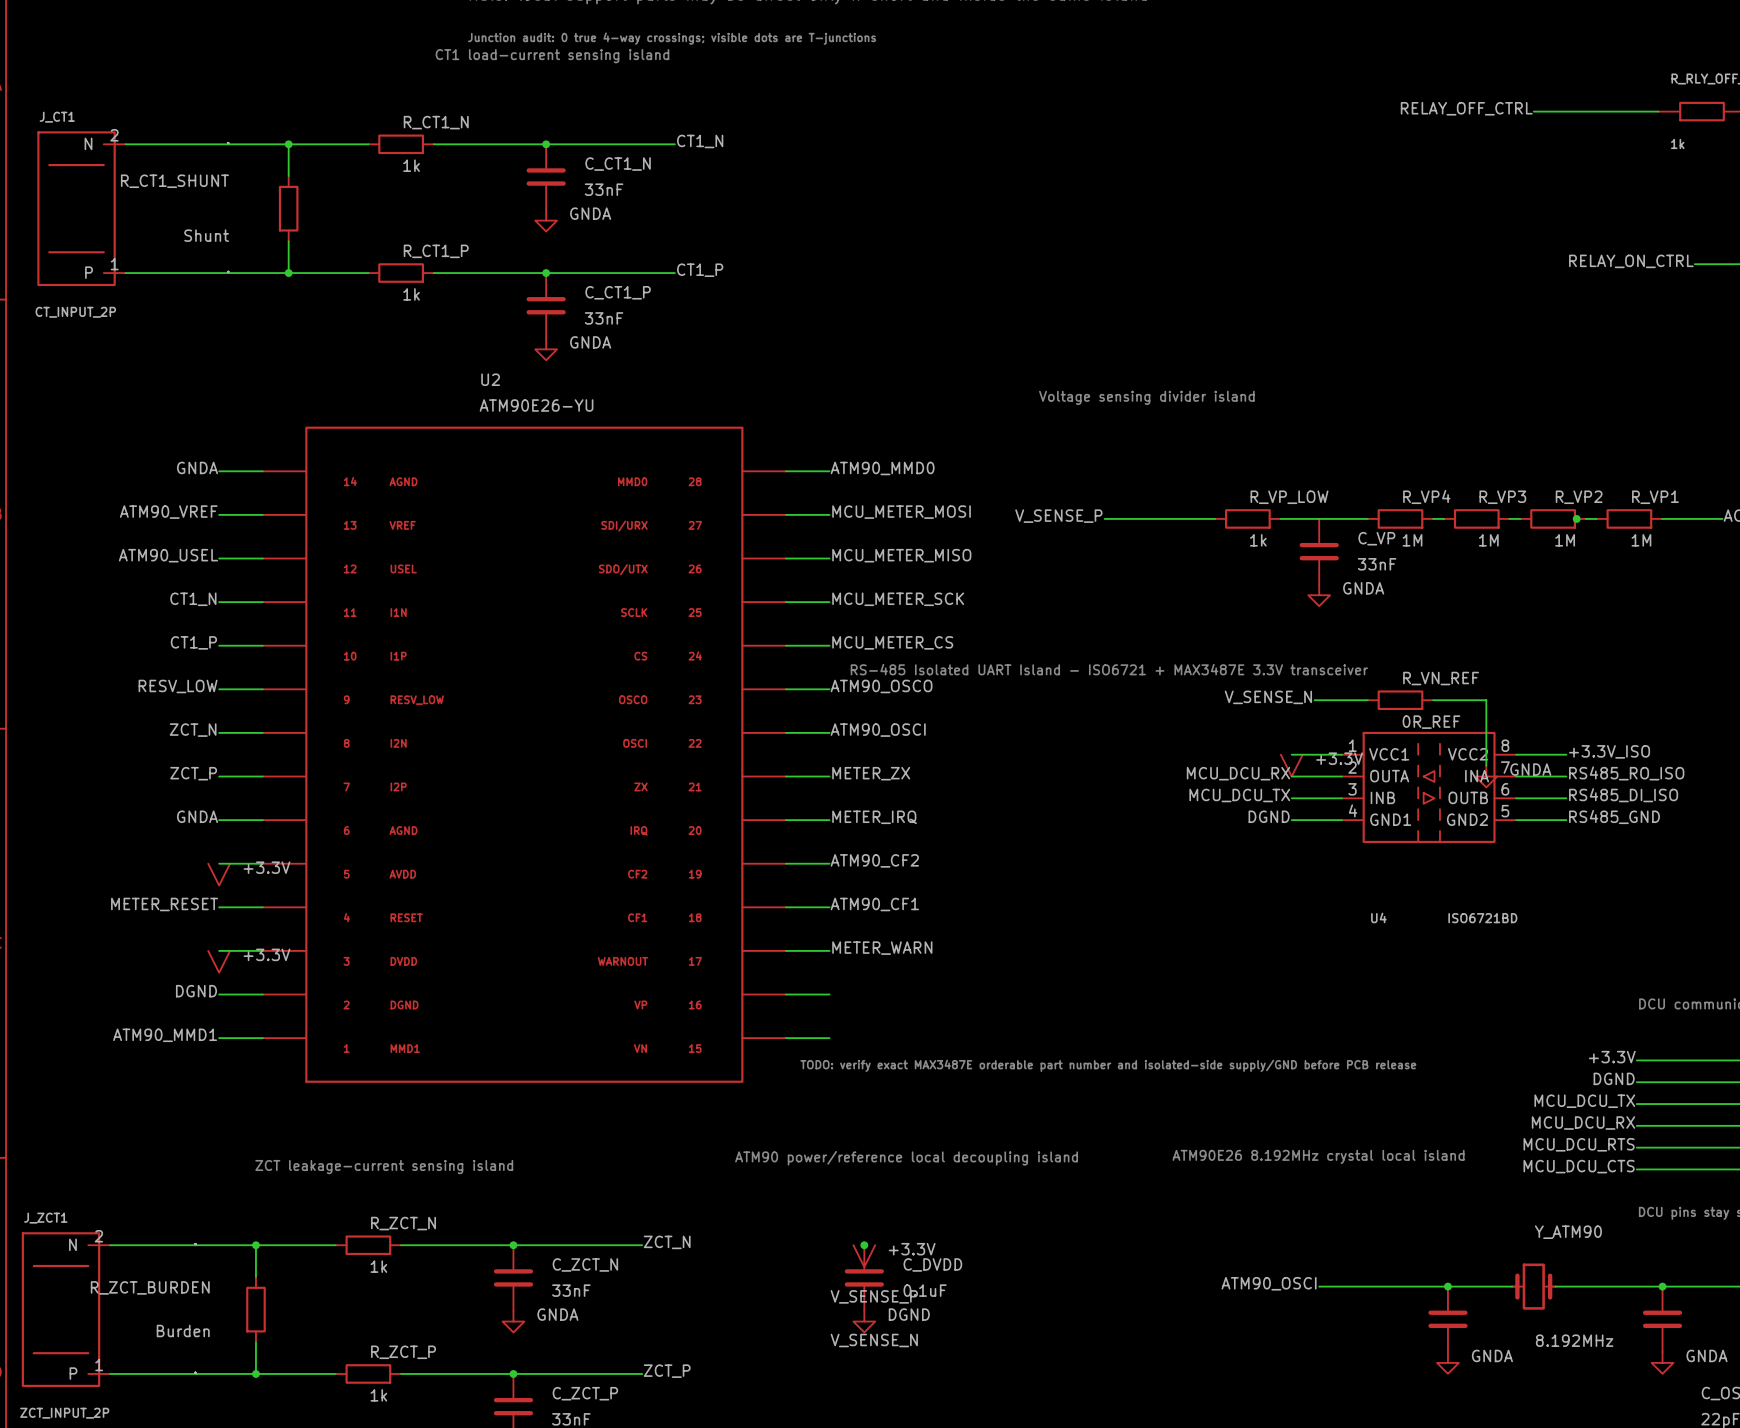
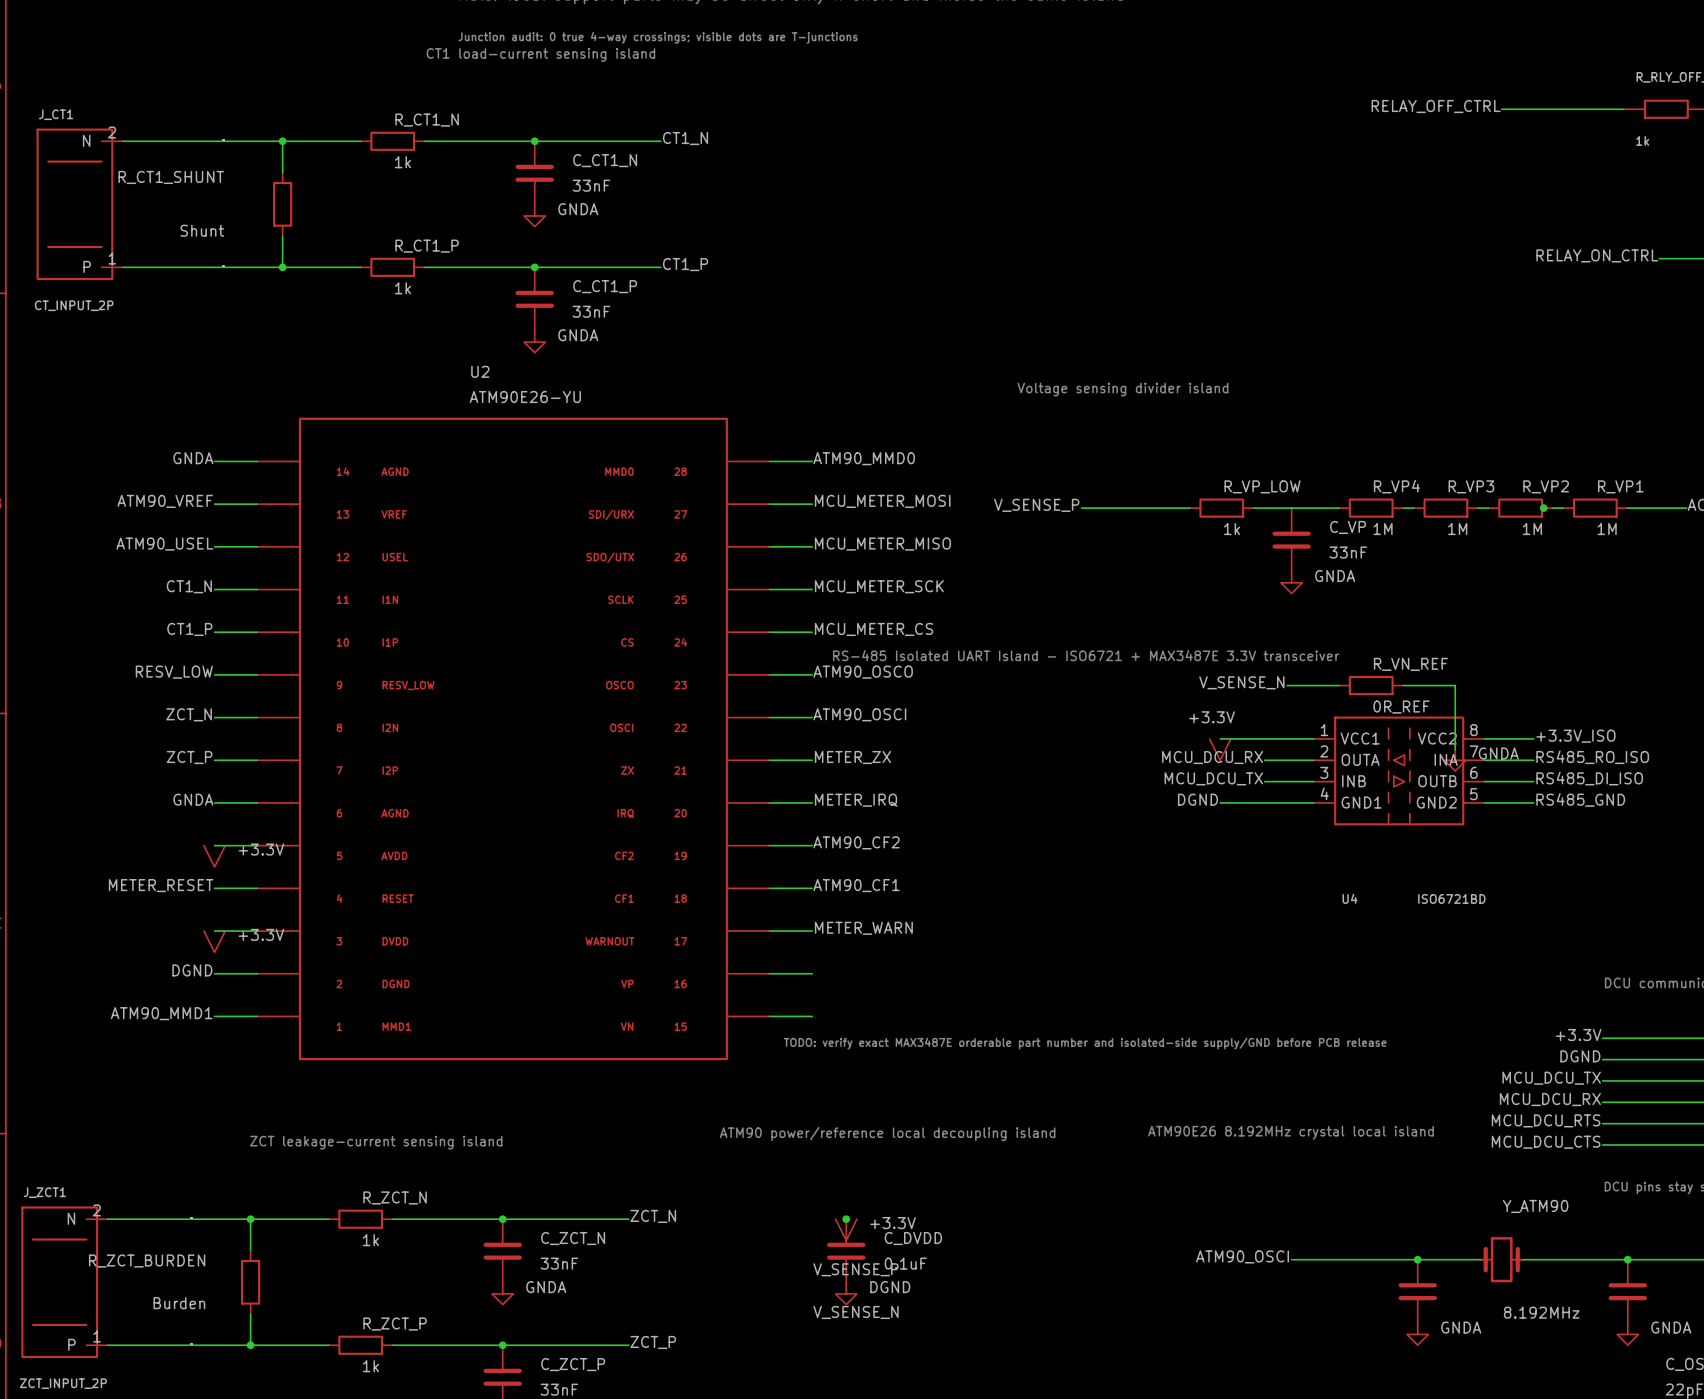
wire: none -> (1220, 738) (1264, 738)
power symbol text position: +3.3V (1339, 758) -> +3.3V (1212, 717)
power symbol position: +3.3V (1291, 765) -> +3.3V (1220, 749)
label position: DGND (1269, 816) -> DGND (1198, 799)
wire: none -> (1220, 802) (1264, 802)

